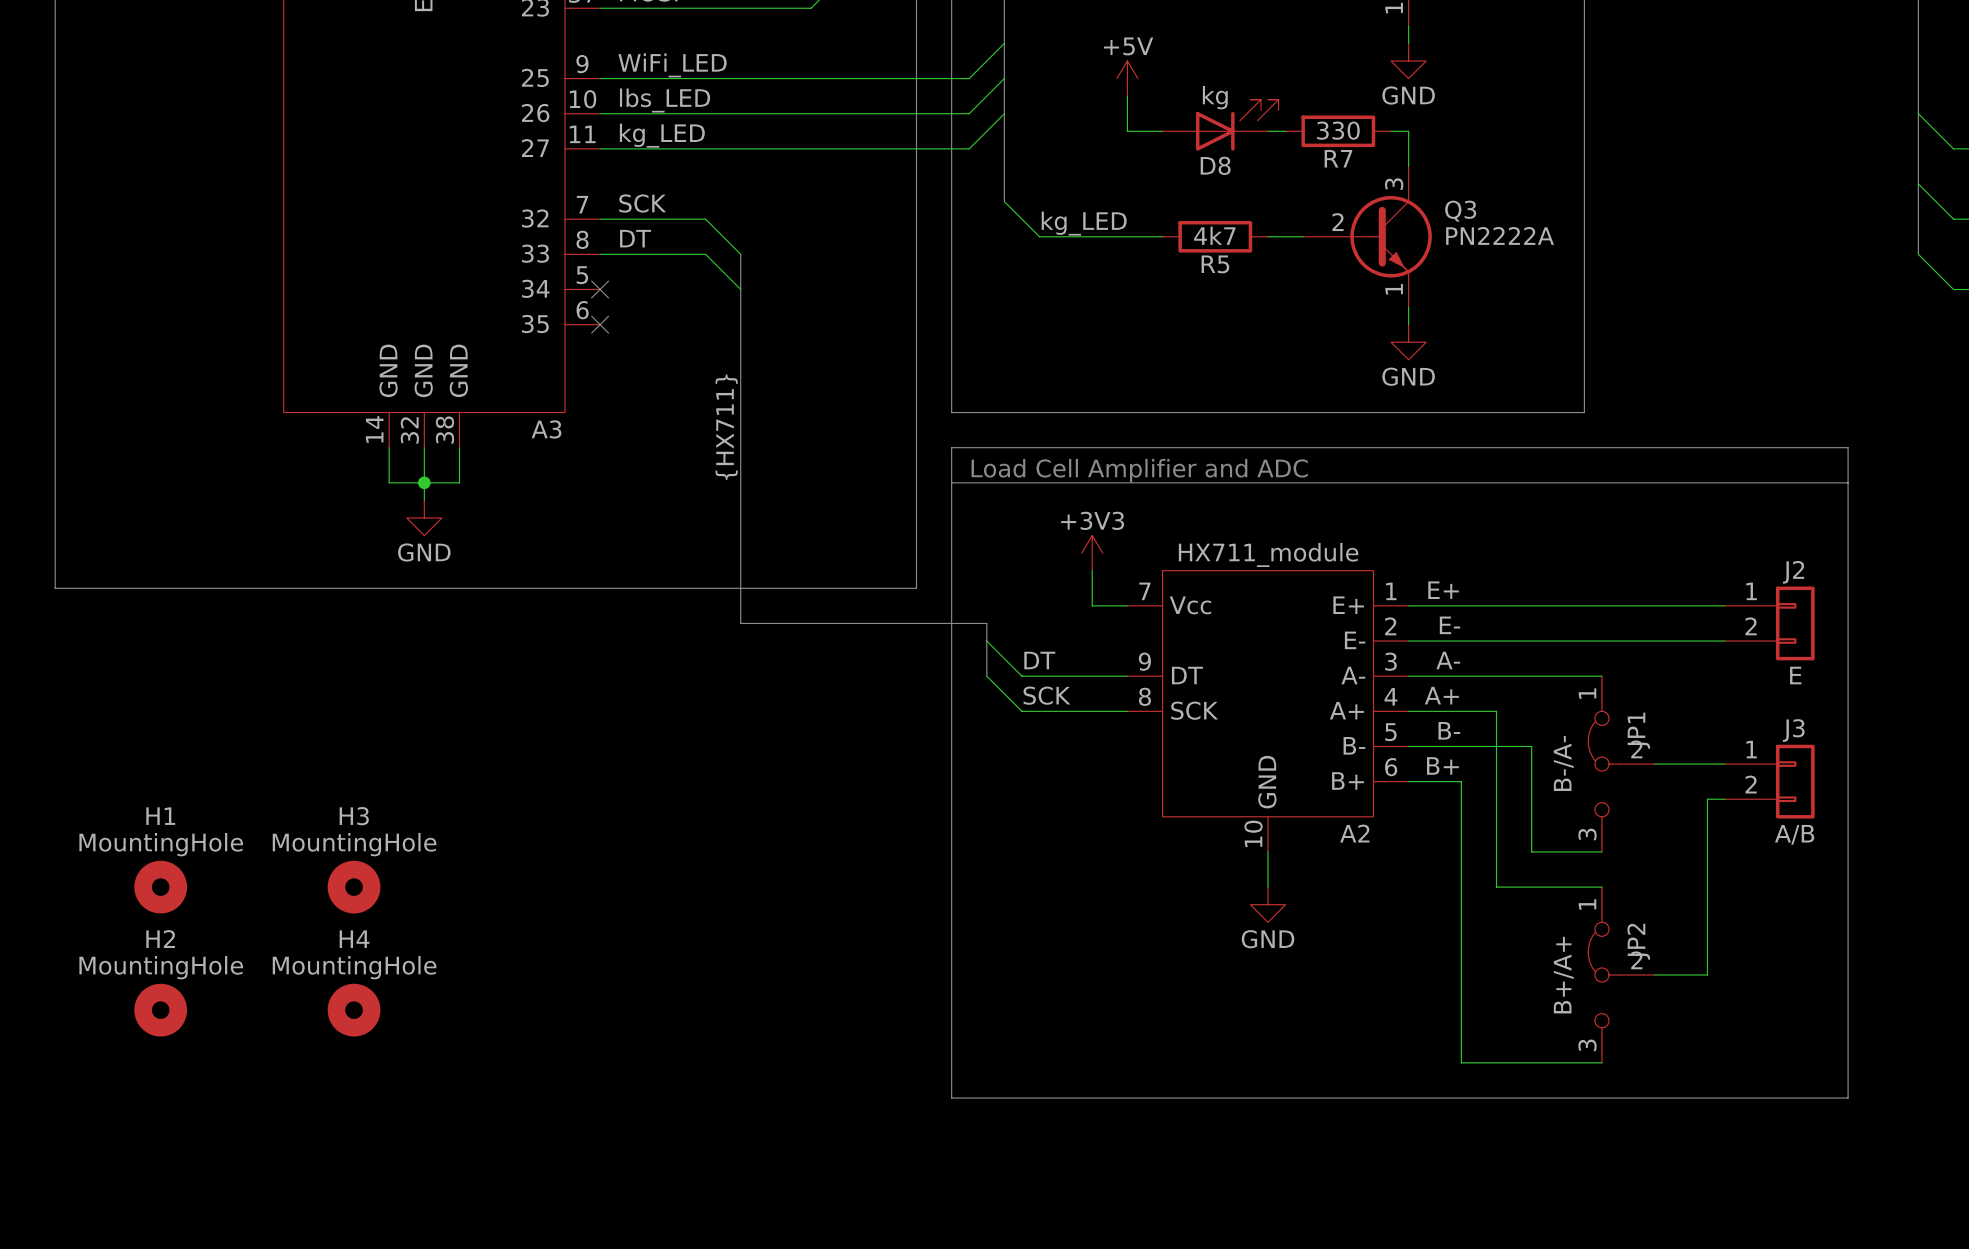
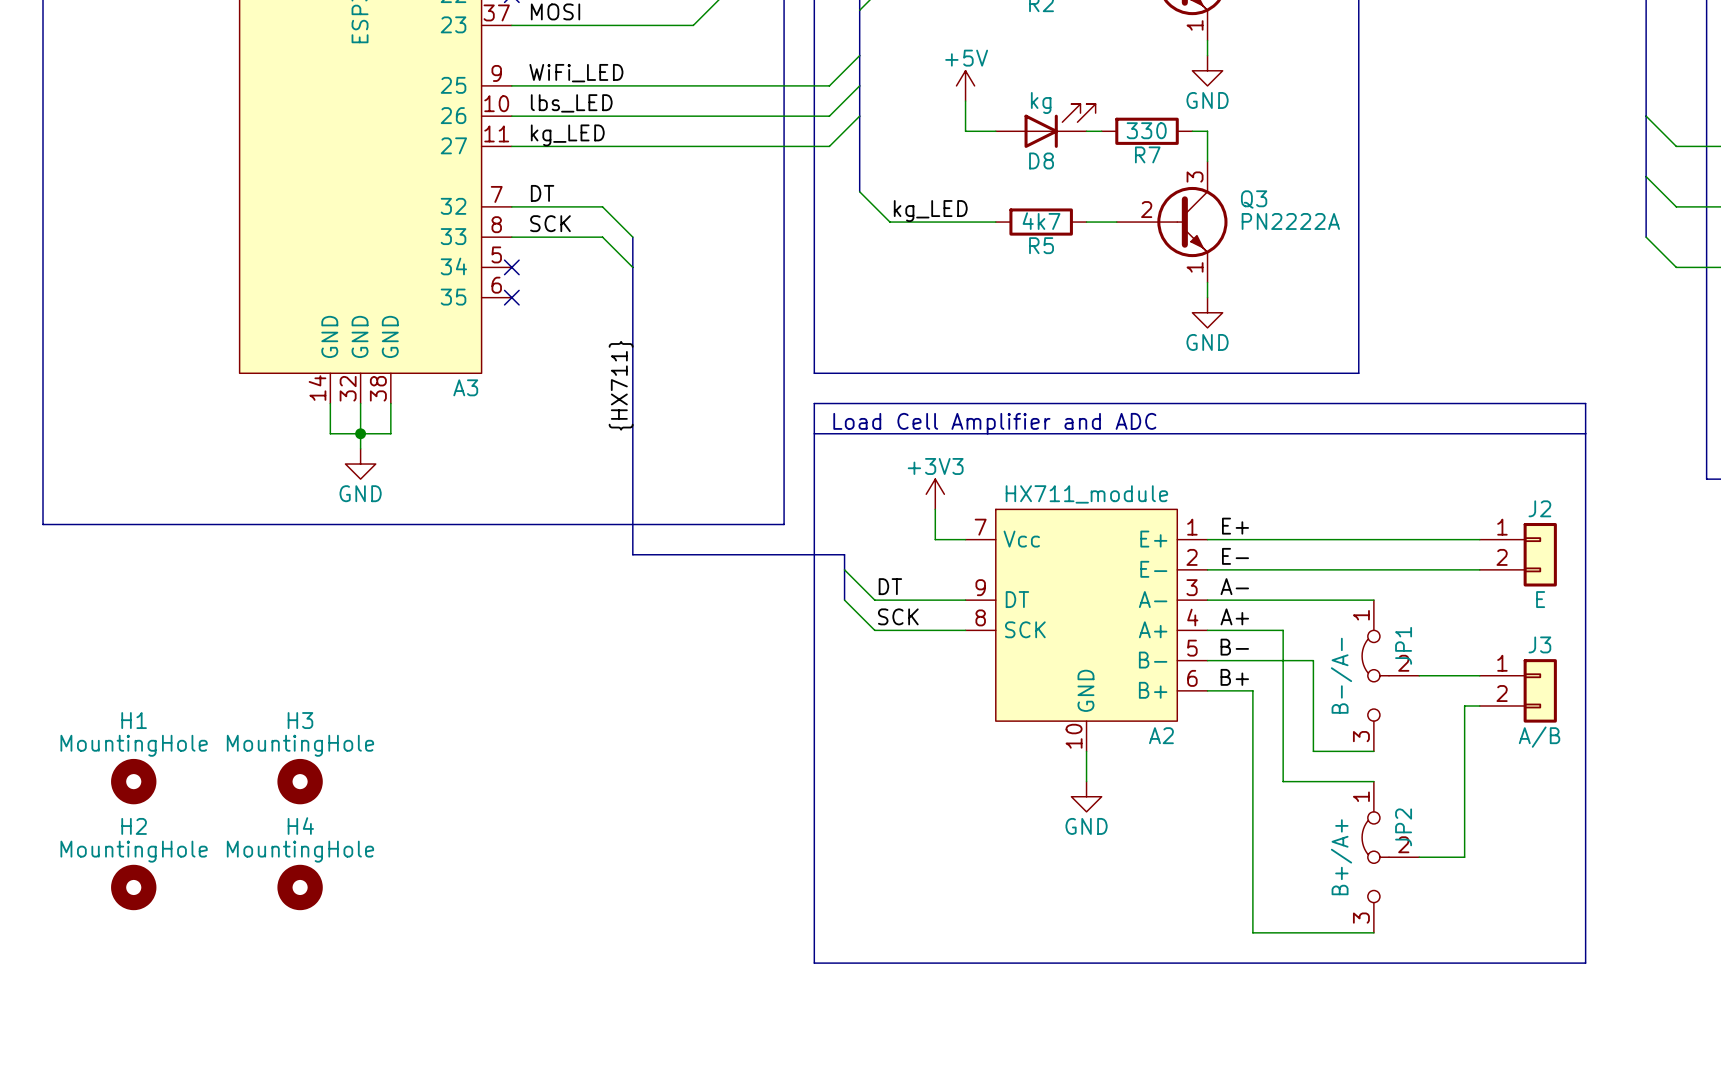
label: SCK (642, 203) -> DT (542, 193)
label: DT (635, 238) -> SCK (550, 223)

